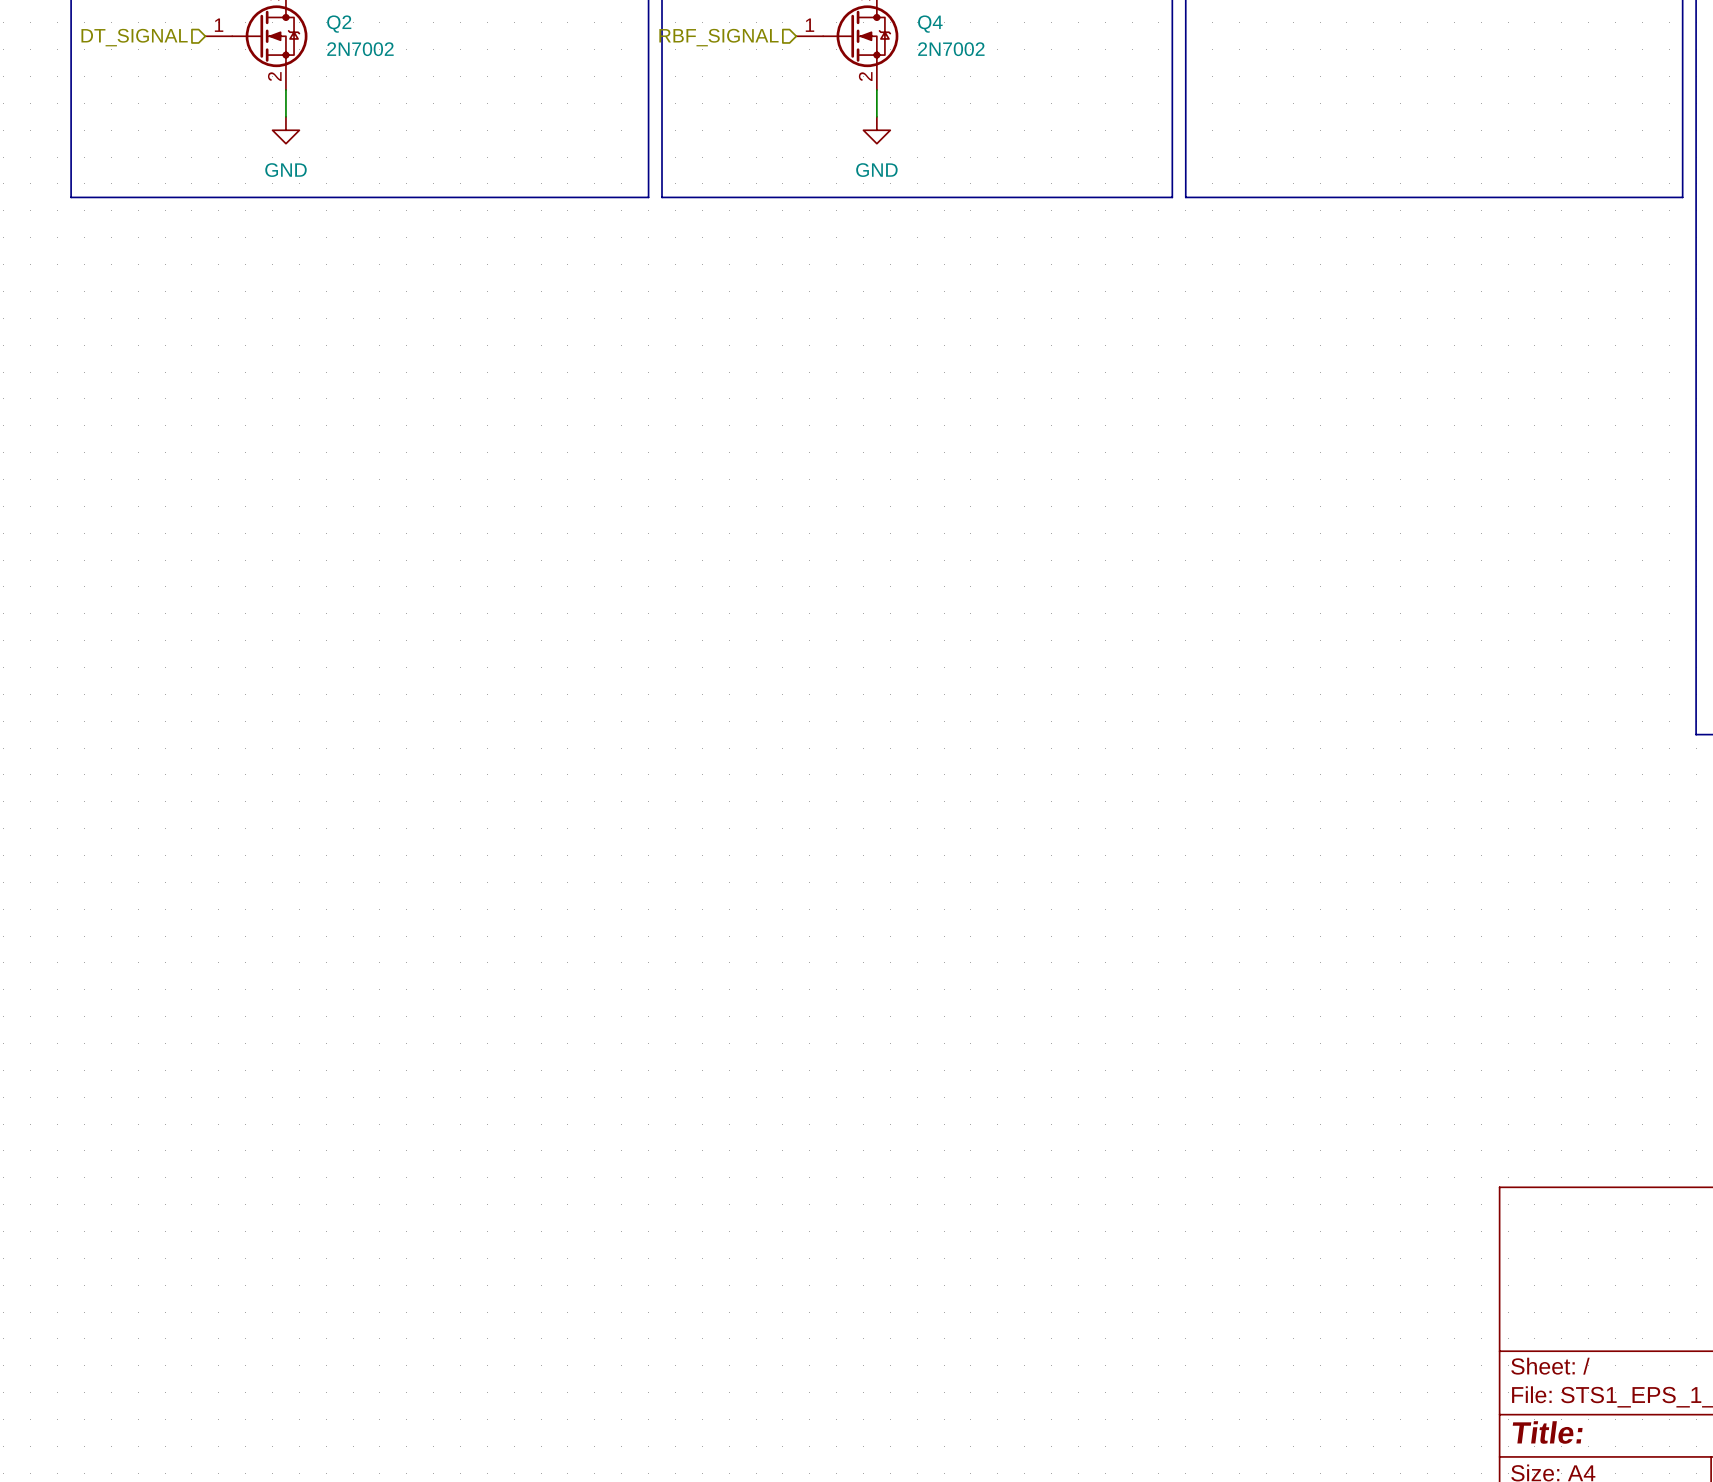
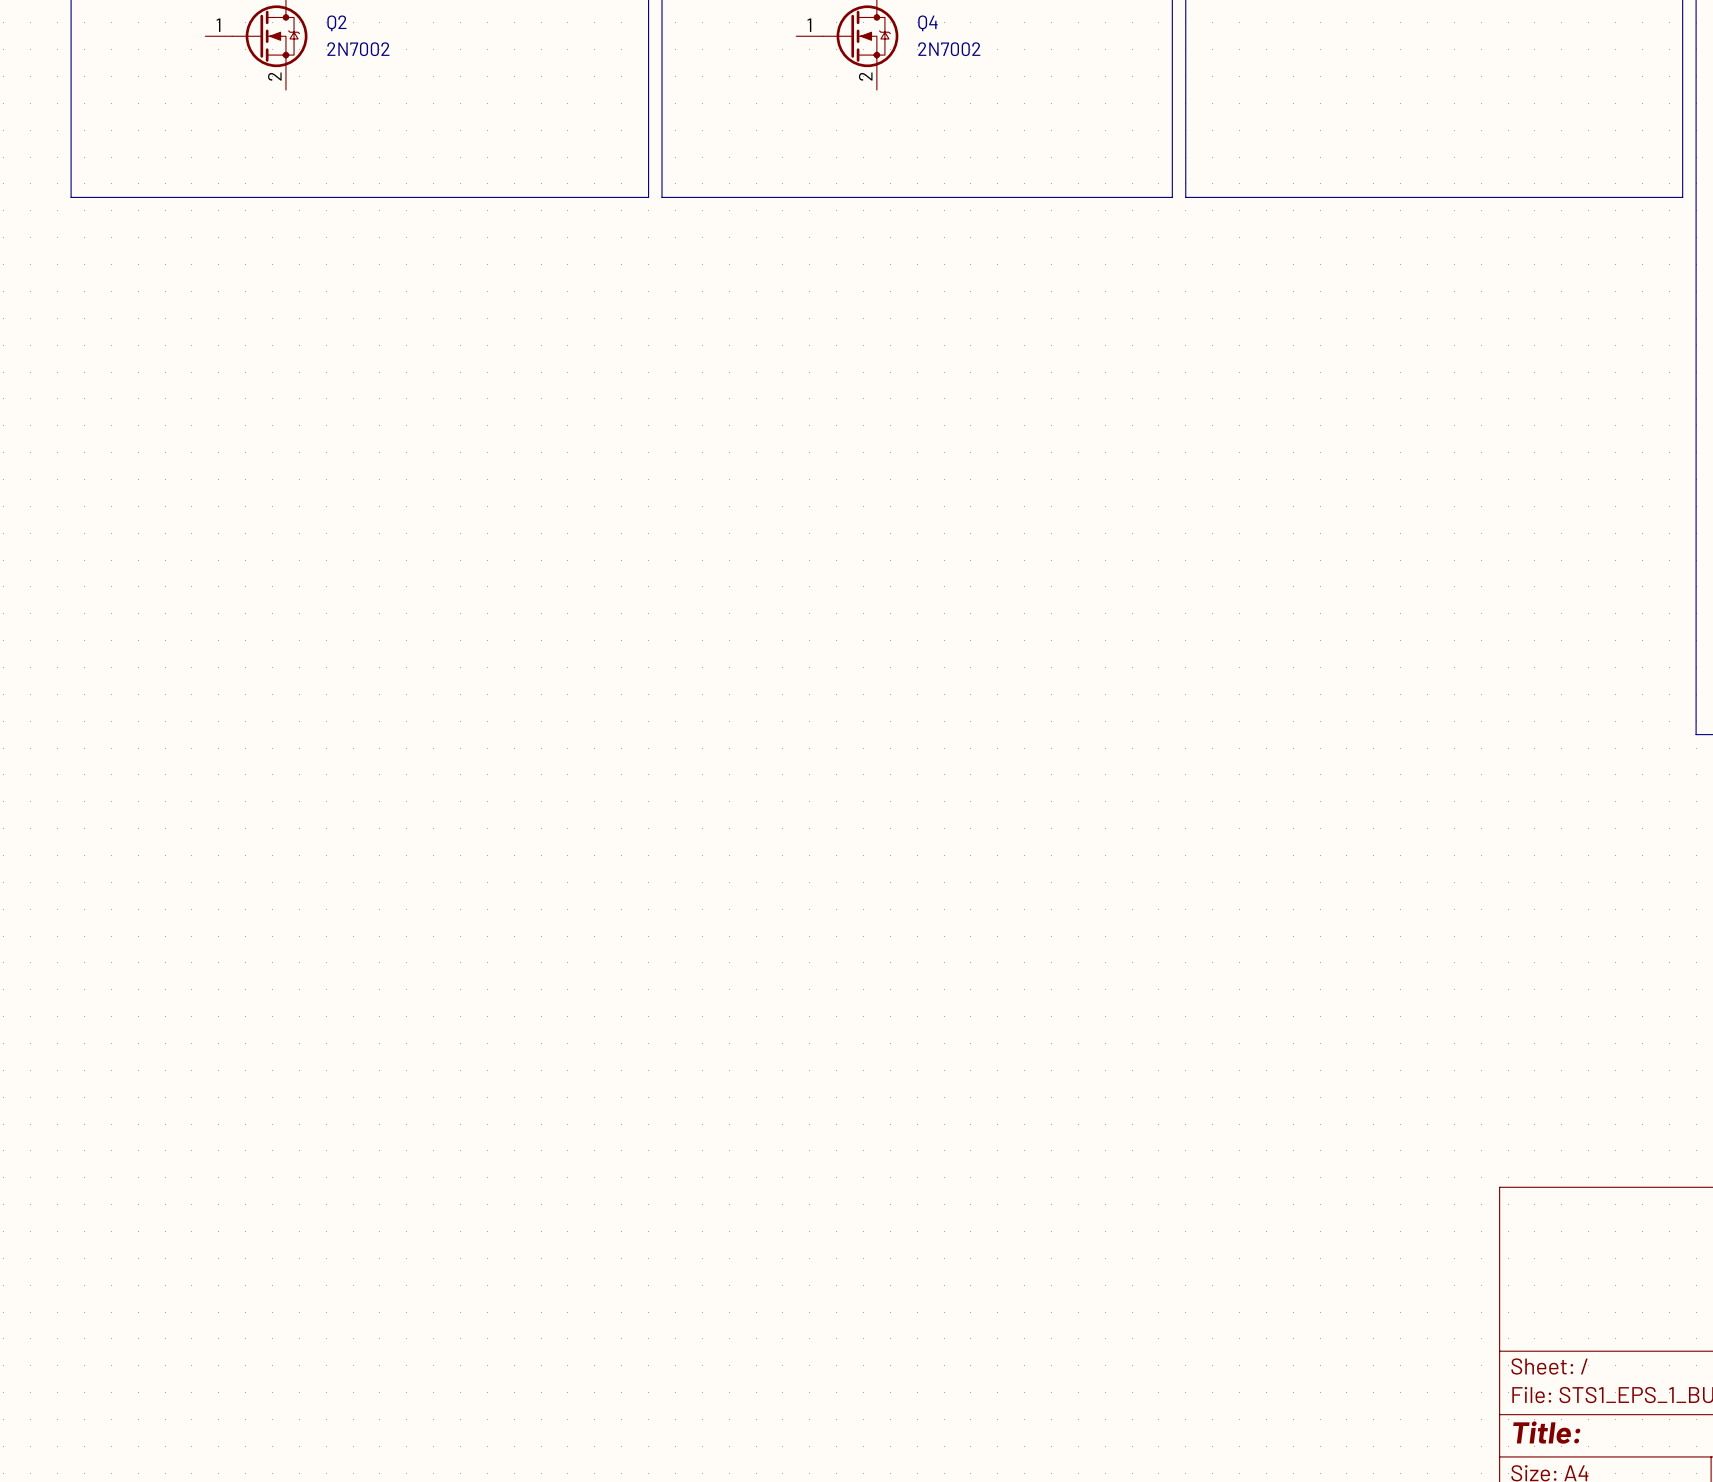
hierarchical label: DT_SIGNAL (134, 37) -> none
hierarchical label: RBF_SIGNAL (718, 37) -> none
wire: (285, 89) (285, 116) -> none
wire: (876, 89) (876, 116) -> none
power symbol: GND (285, 130) -> none
power symbol: GND (876, 130) -> none

